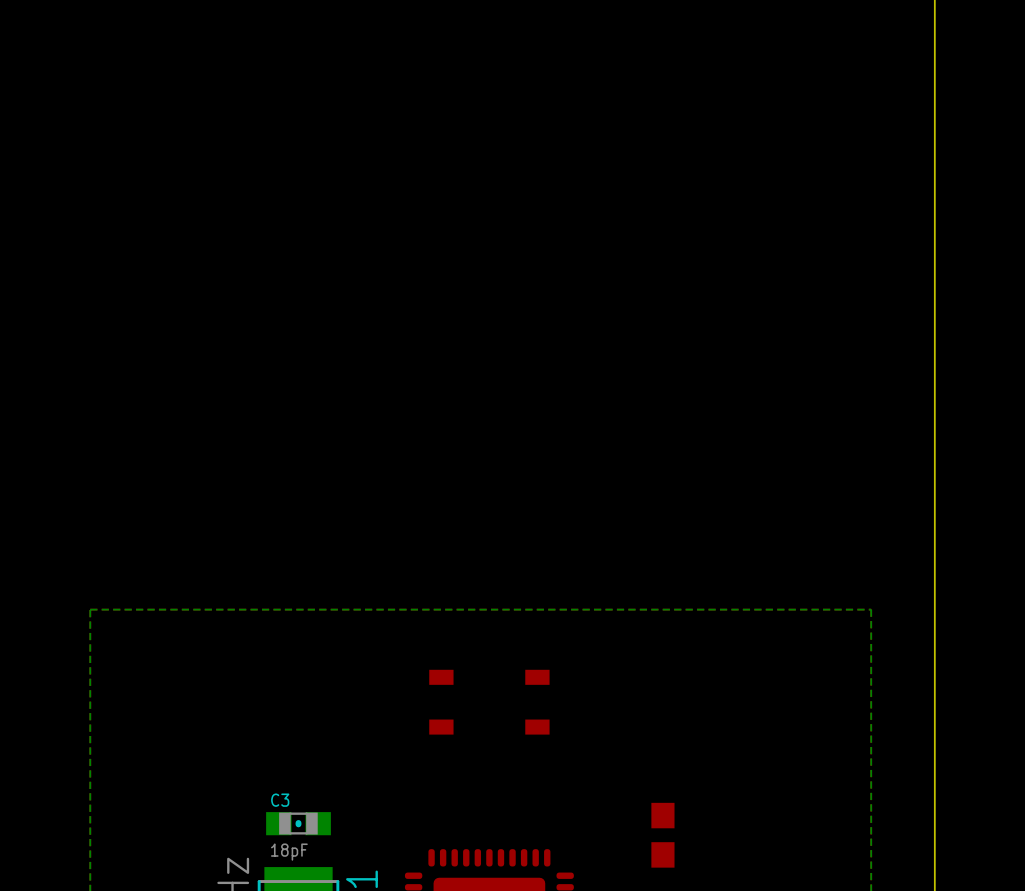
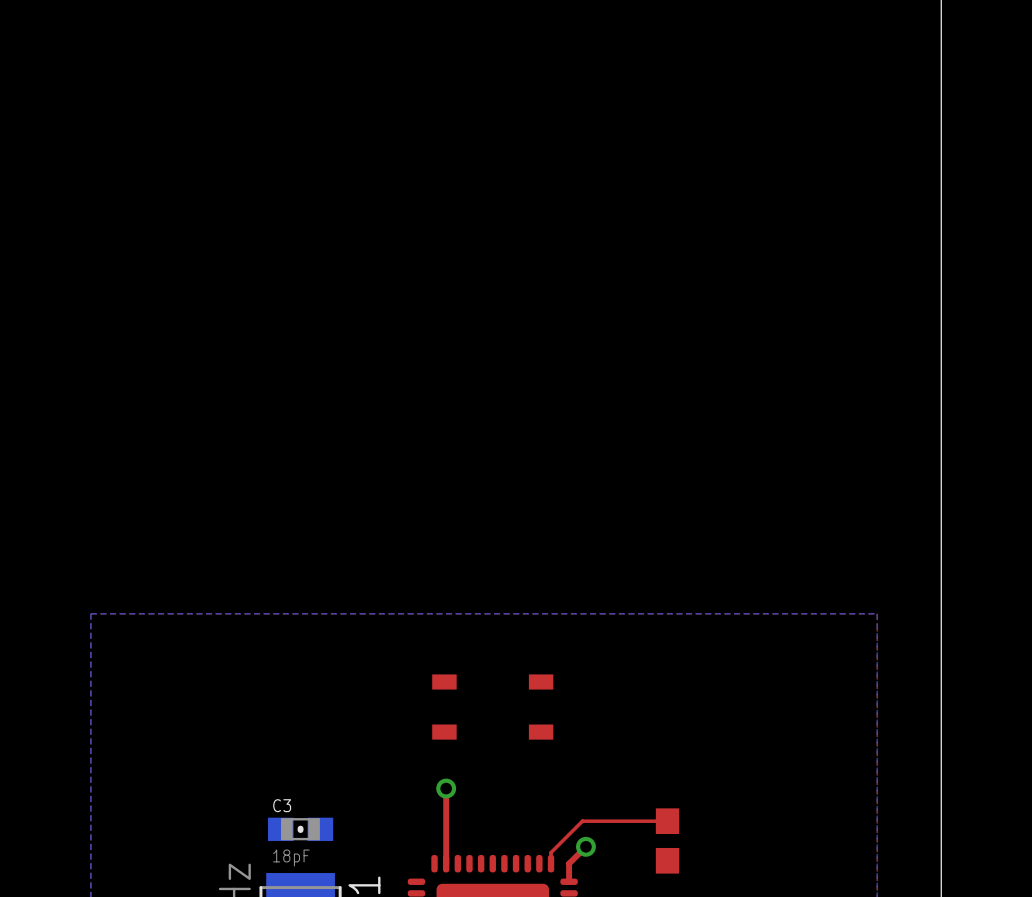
top track: none -> (446, 788) (446, 863)
via: none -> (446, 788)
top track: none -> (667, 821) (582, 821) (551, 852) (551, 863)
top track: none -> (585, 846) (569, 863) (569, 881)
via: none -> (585, 846)

